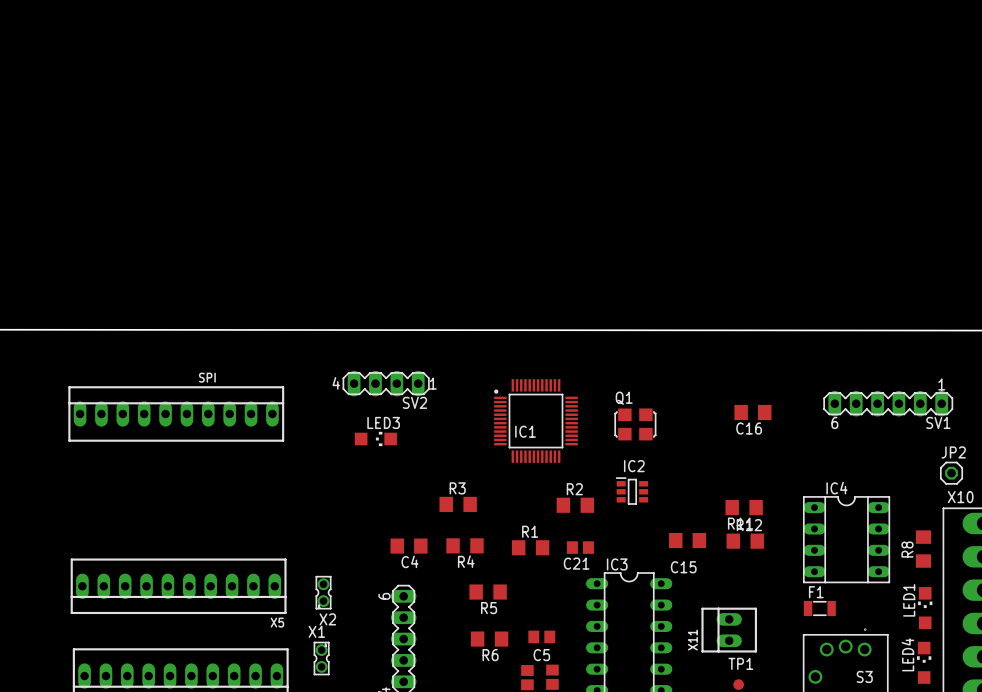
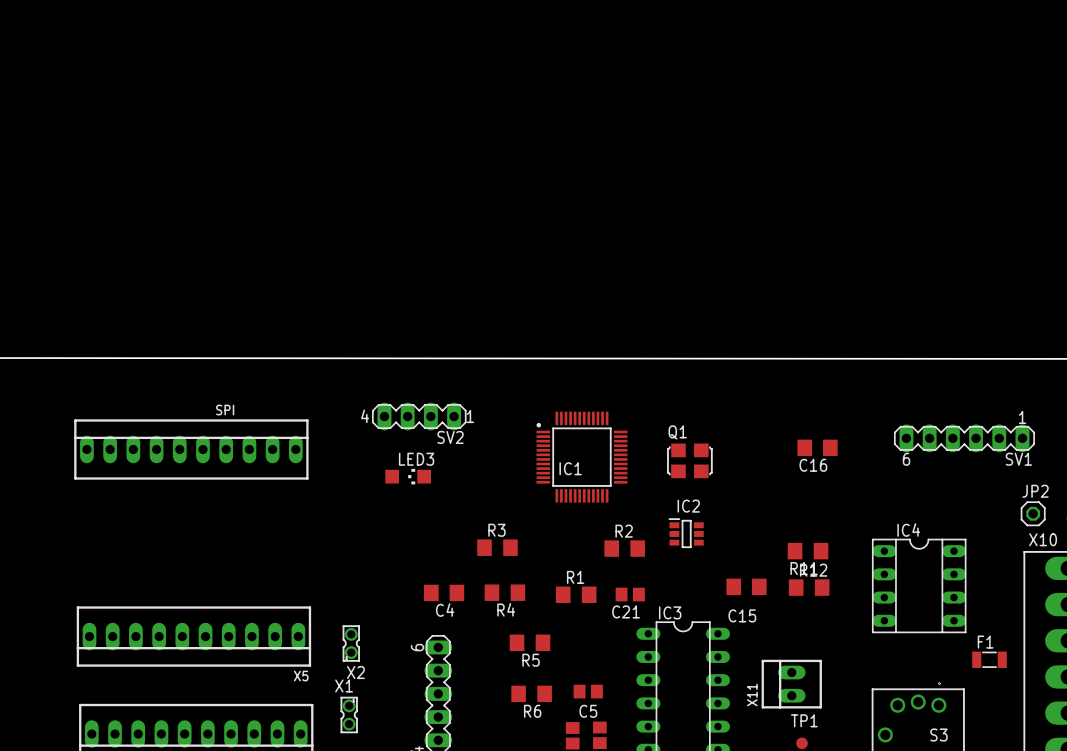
R8: (923, 549) -> none
F1 position: (819, 608) -> (989, 659)
LED1: (925, 608) -> none
LED4: (924, 662) -> none

